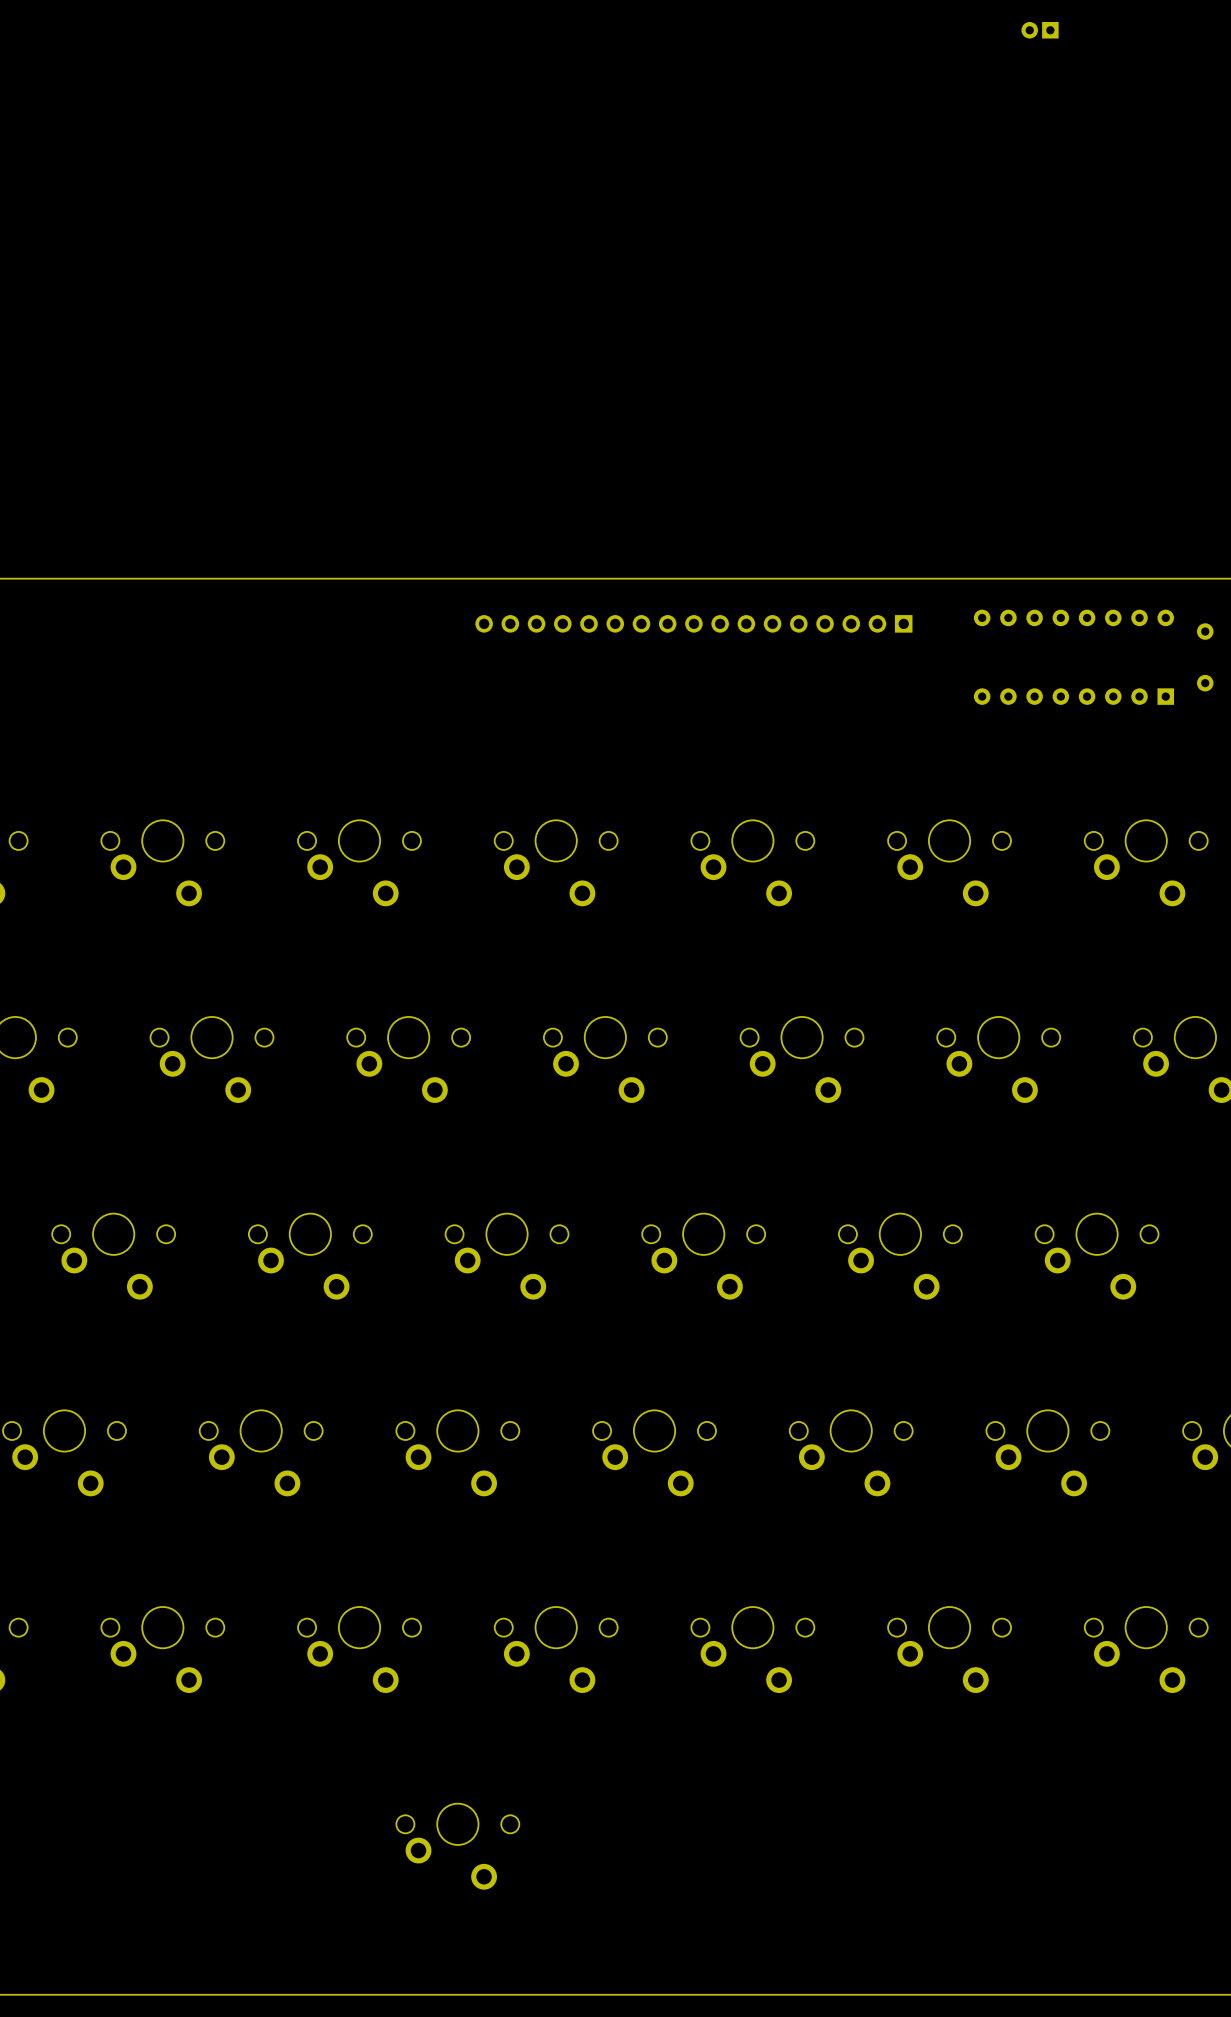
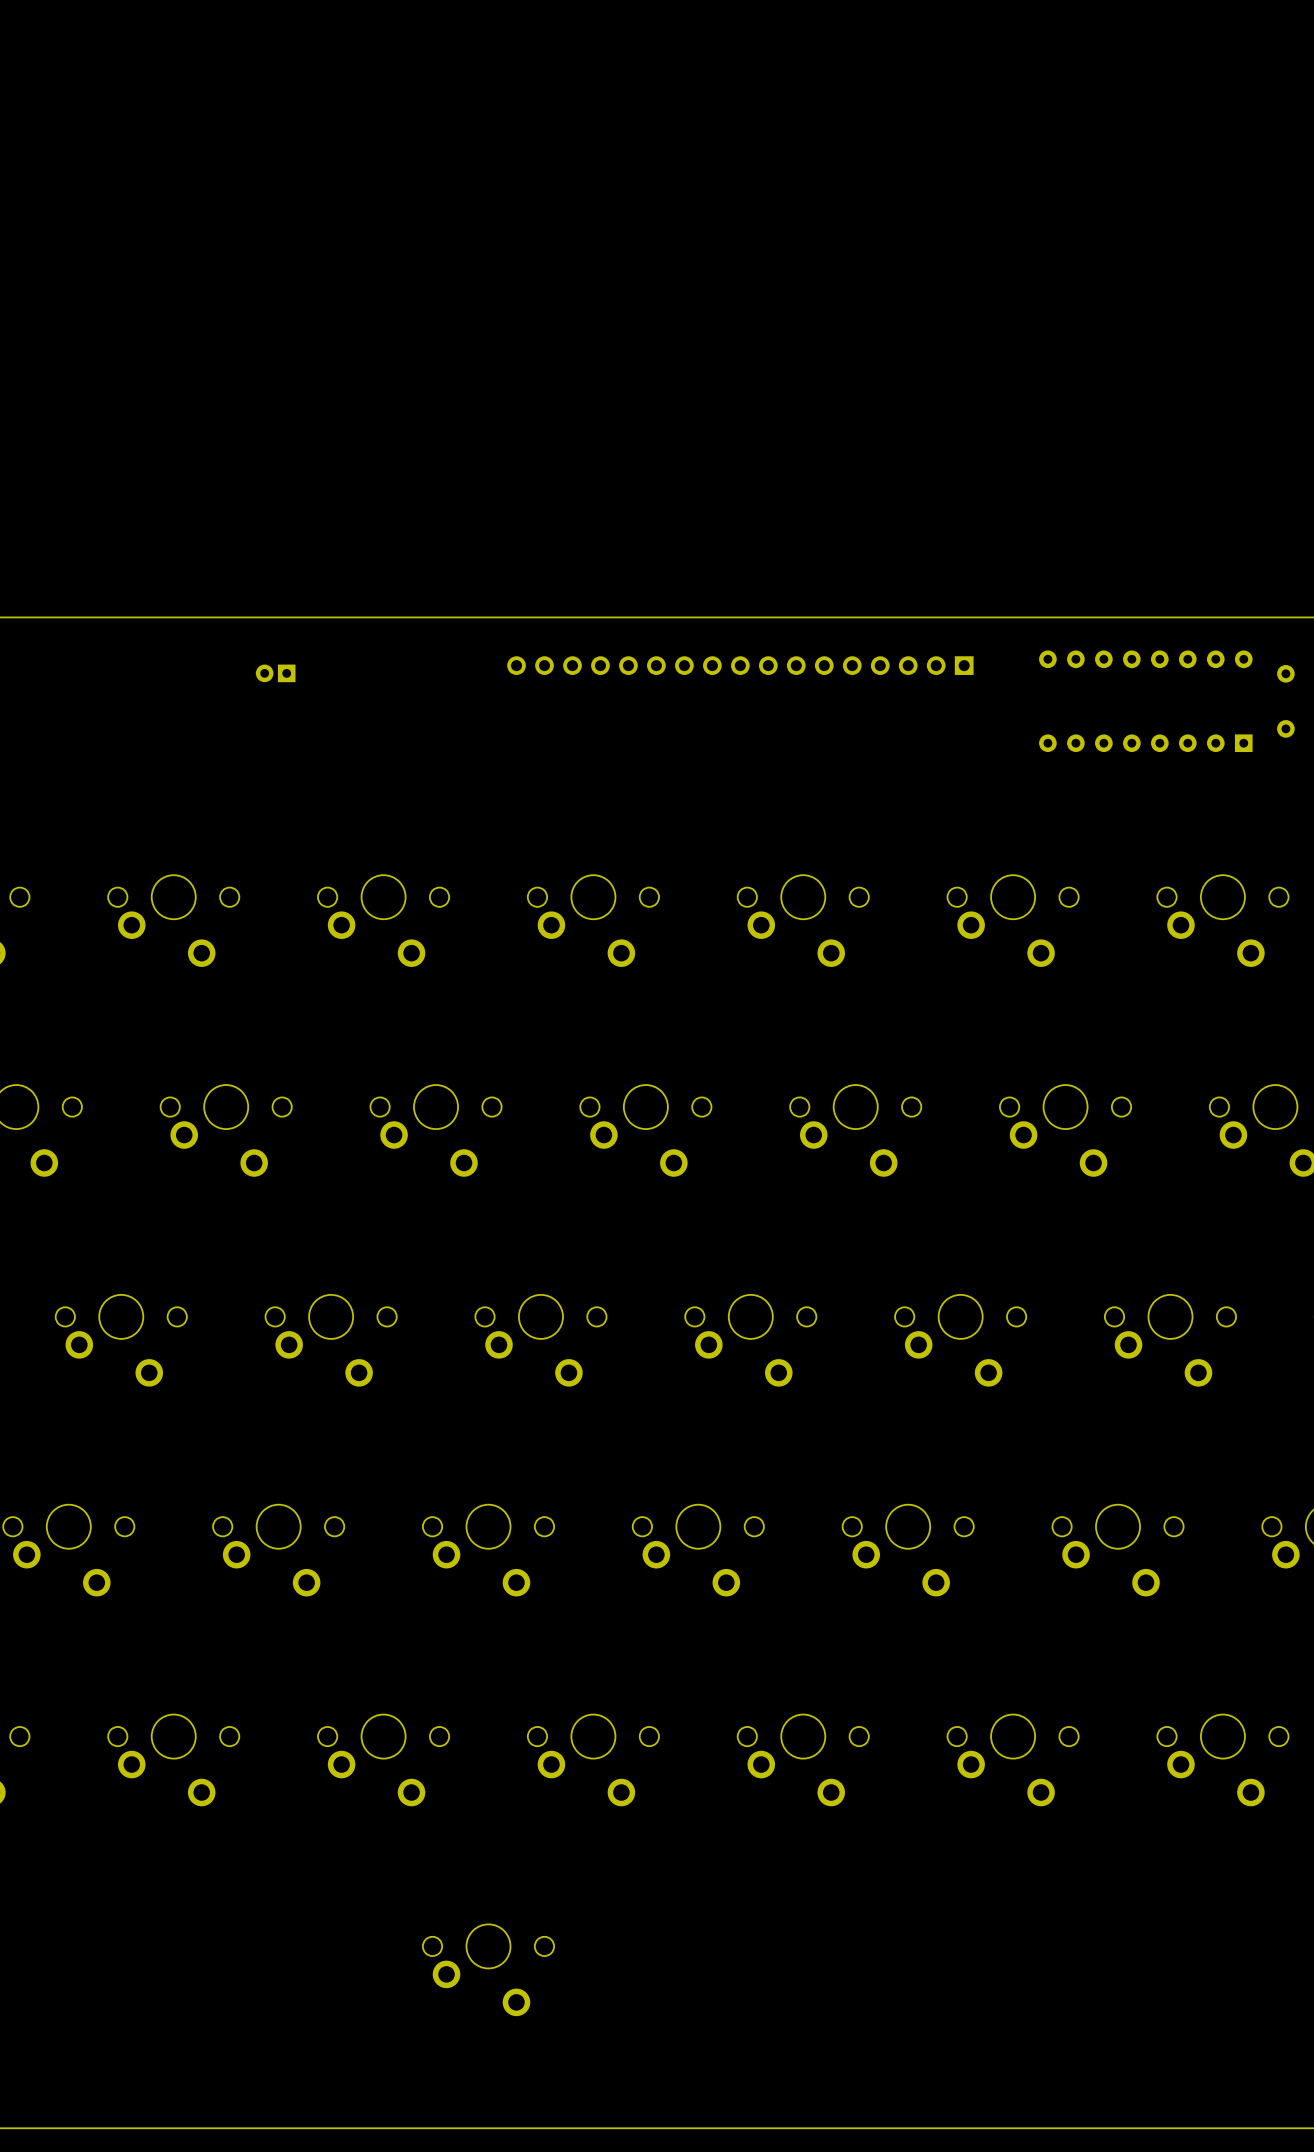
part: (1040, 30) -> none
part: none -> (275, 673)

